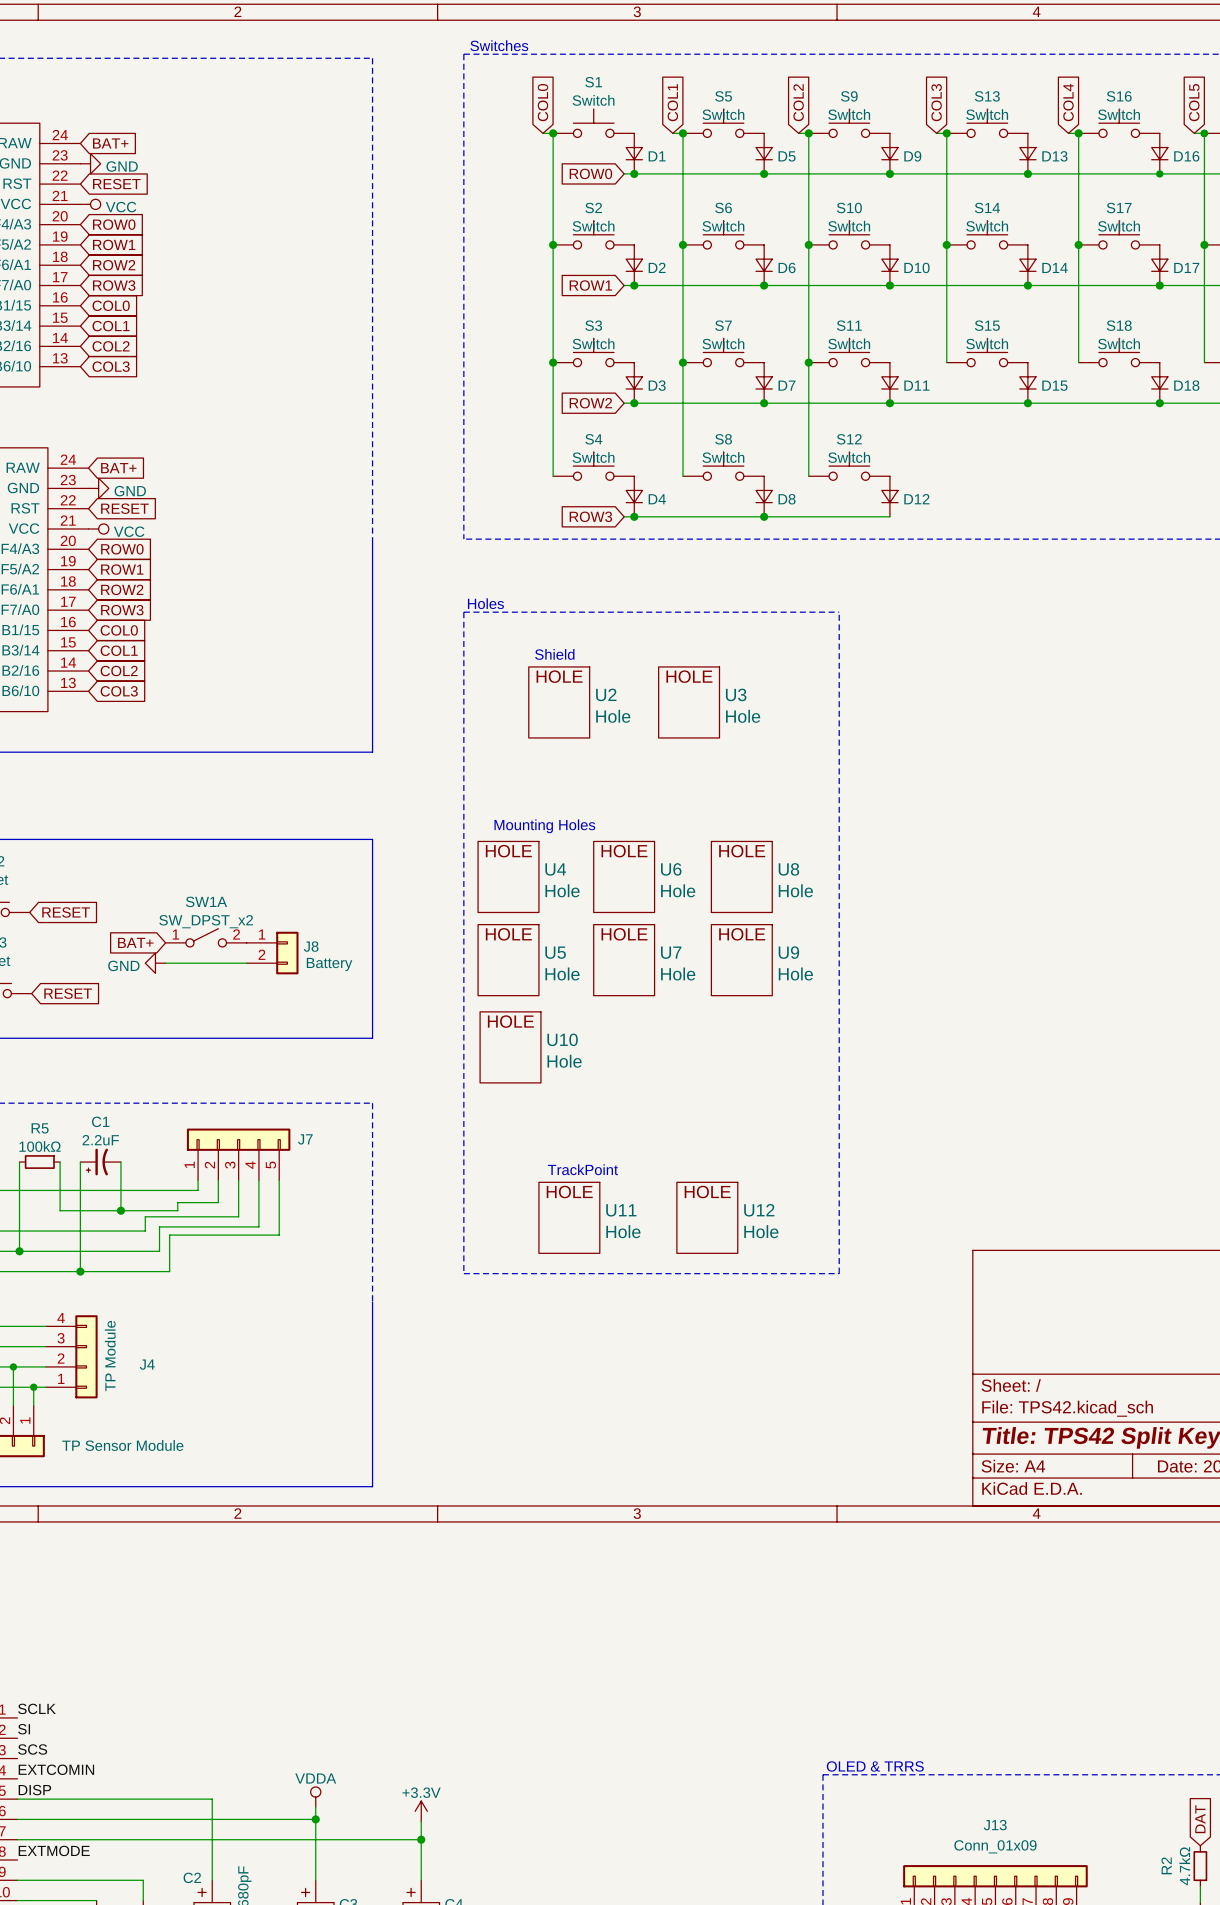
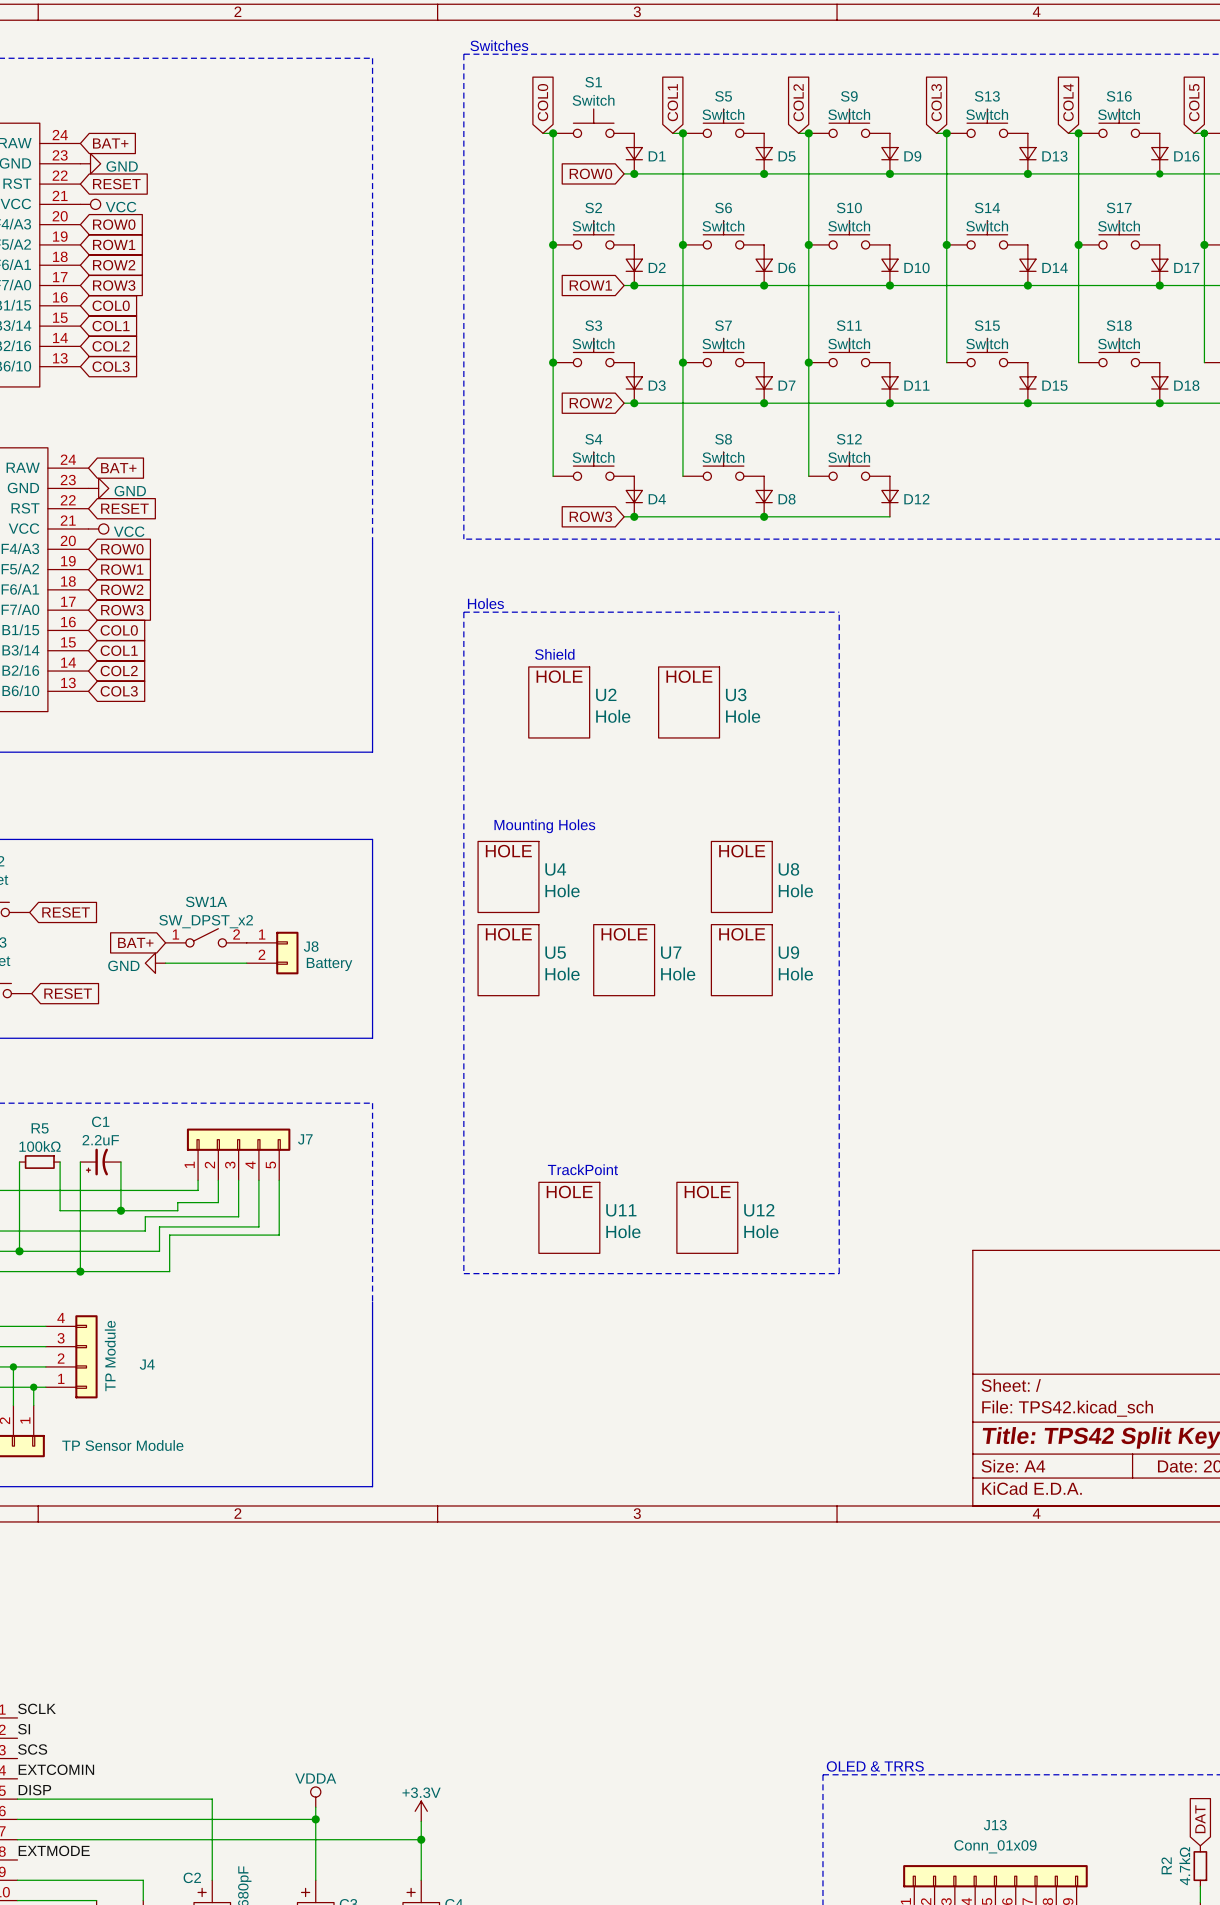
U6: Hole (624, 876) -> none
U10: Hole (510, 1047) -> none

